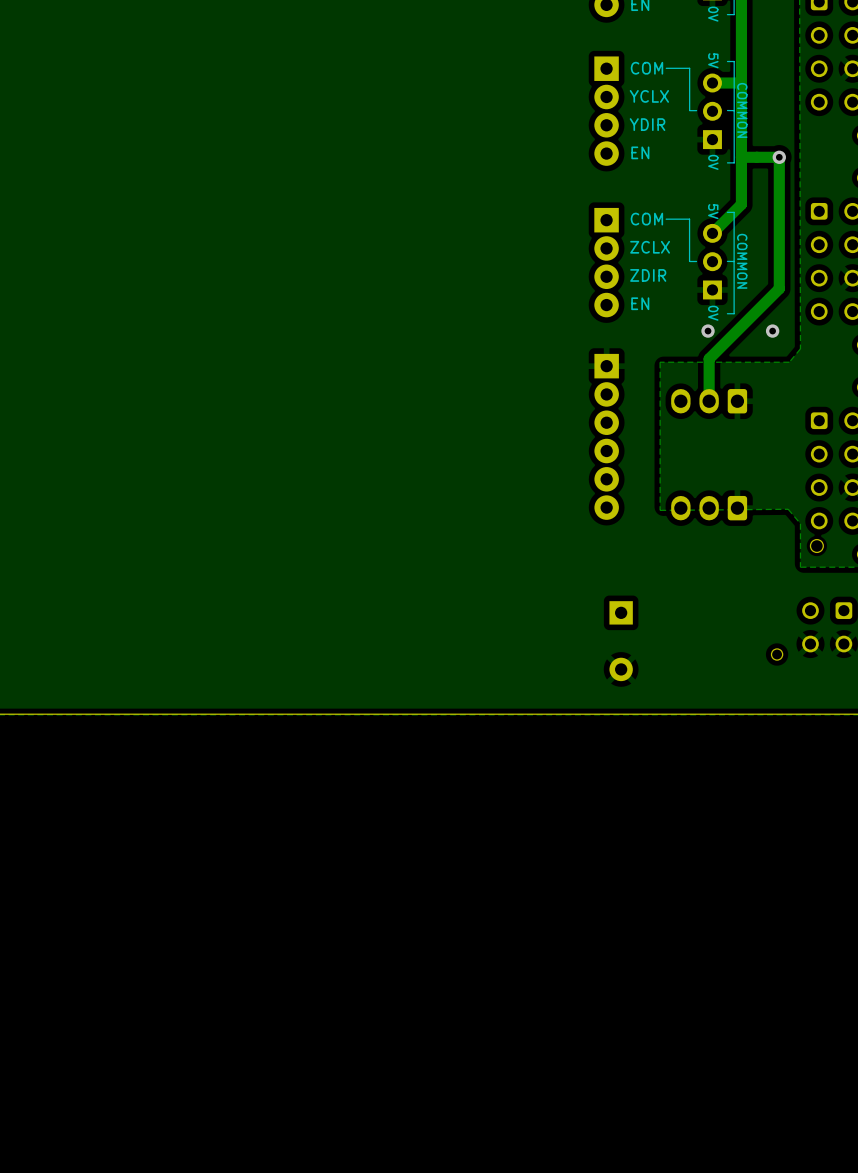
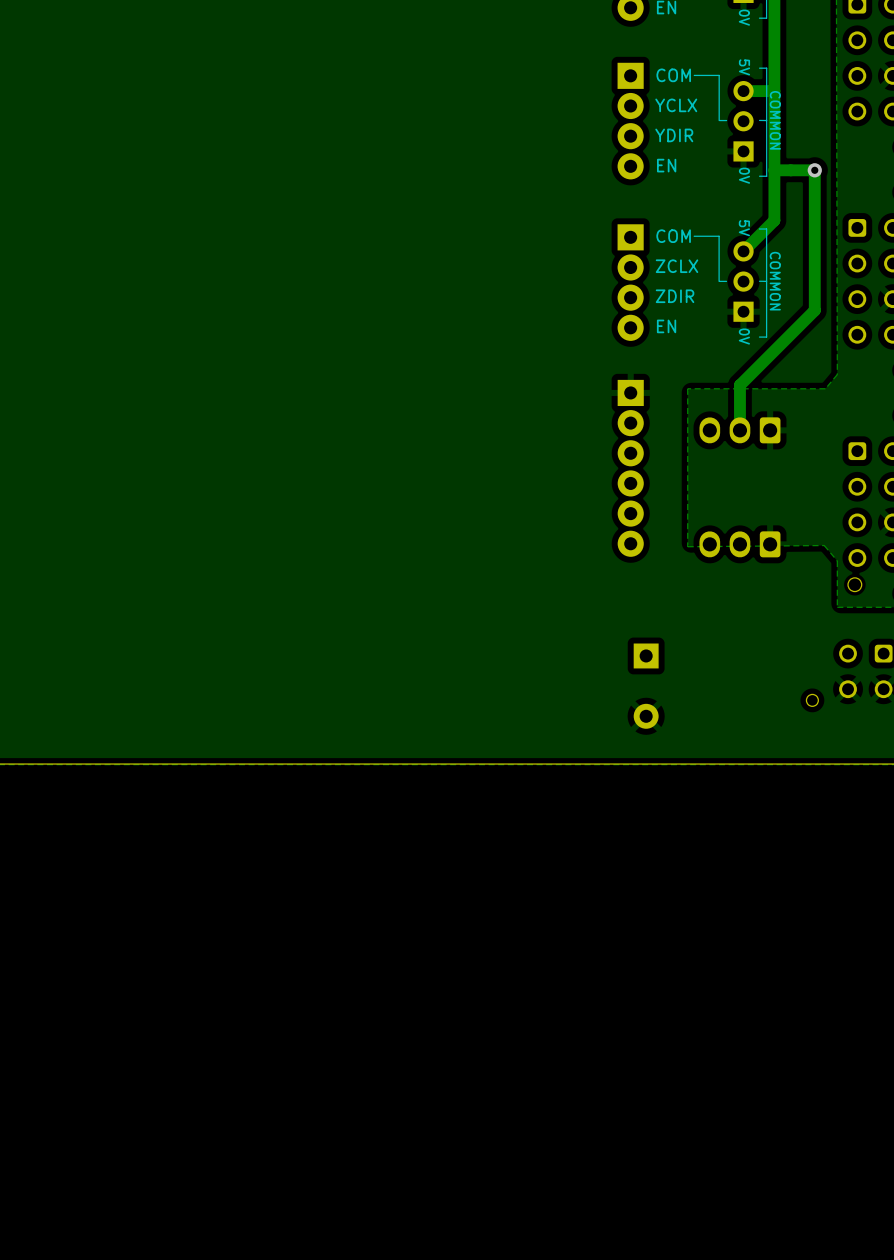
via: (708, 331) -> none
via: (772, 331) -> none

